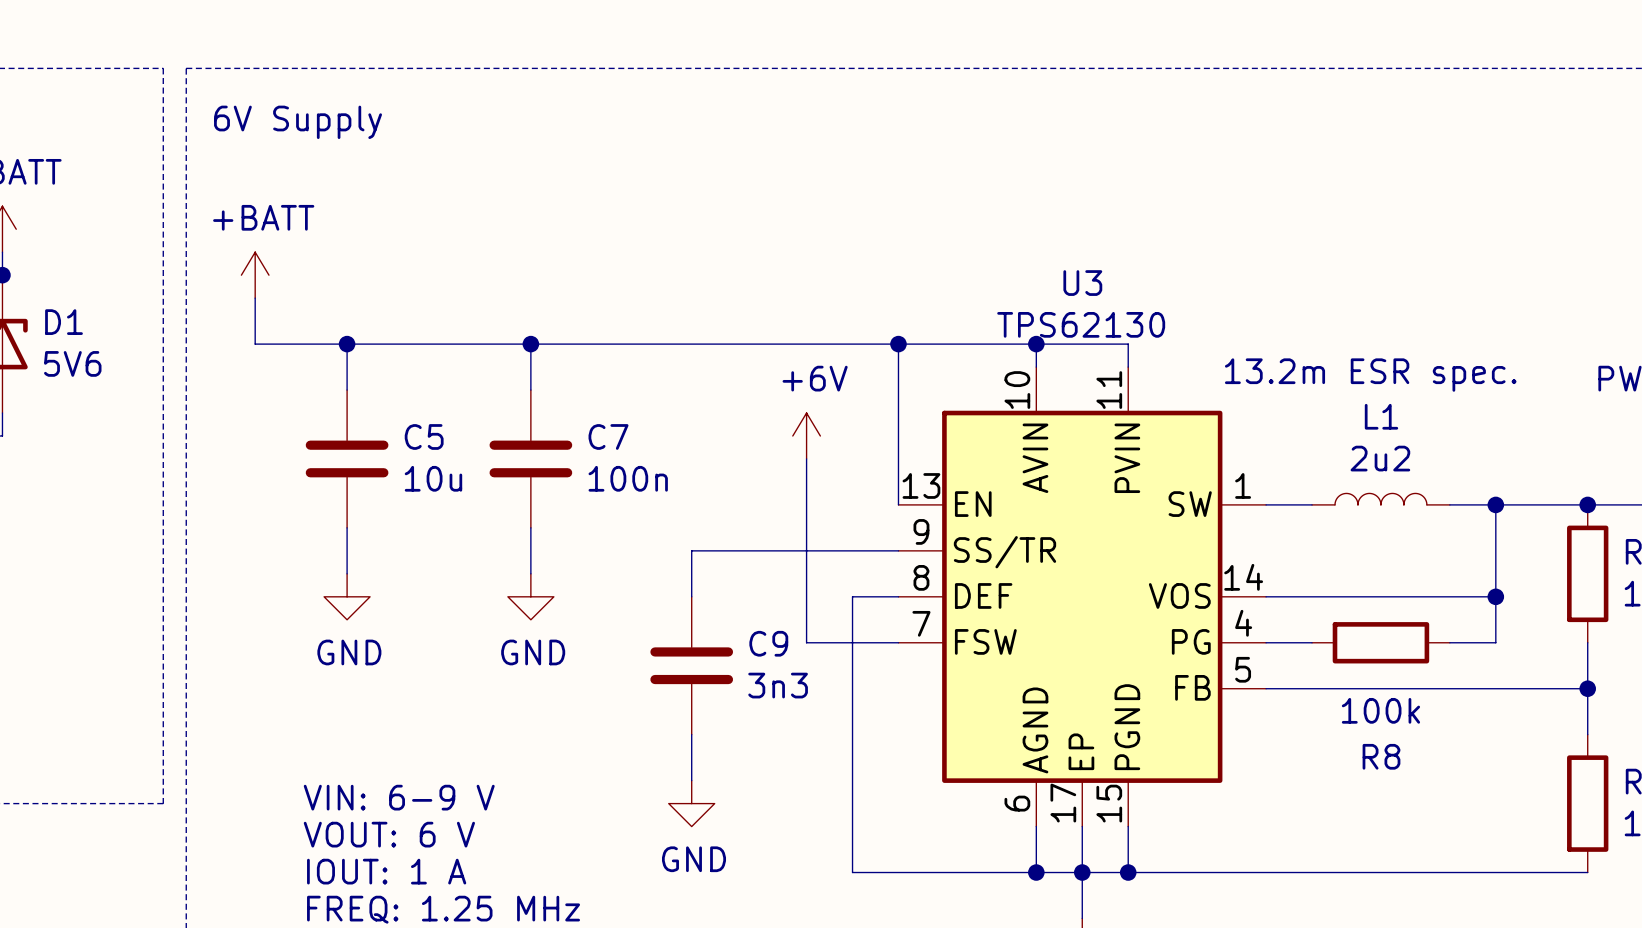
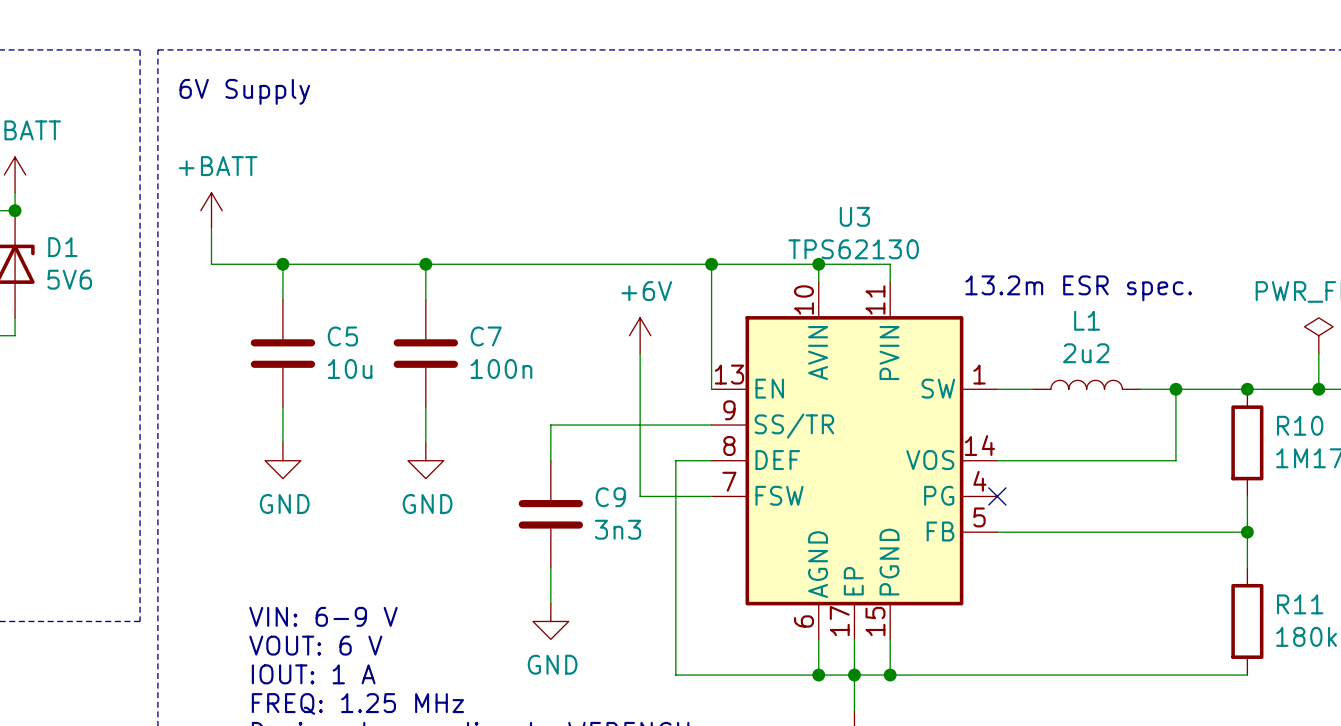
wire: (1495, 596) (1495, 642) (1449, 642) -> none
junction: (1495, 596) -> none
wire: (1266, 642) (1312, 642) -> none
no-connect mark: none -> (997, 496)
R8: 100k (1380, 642) -> none

